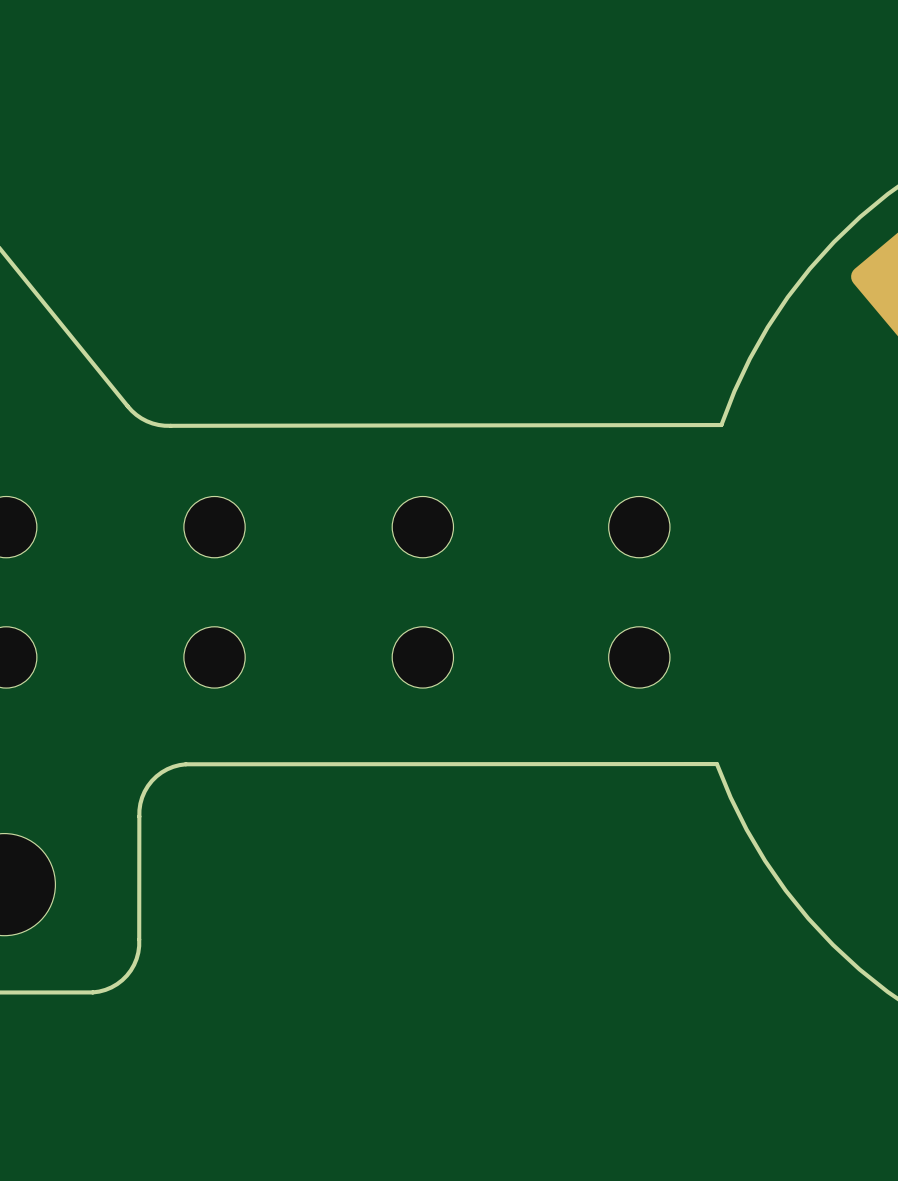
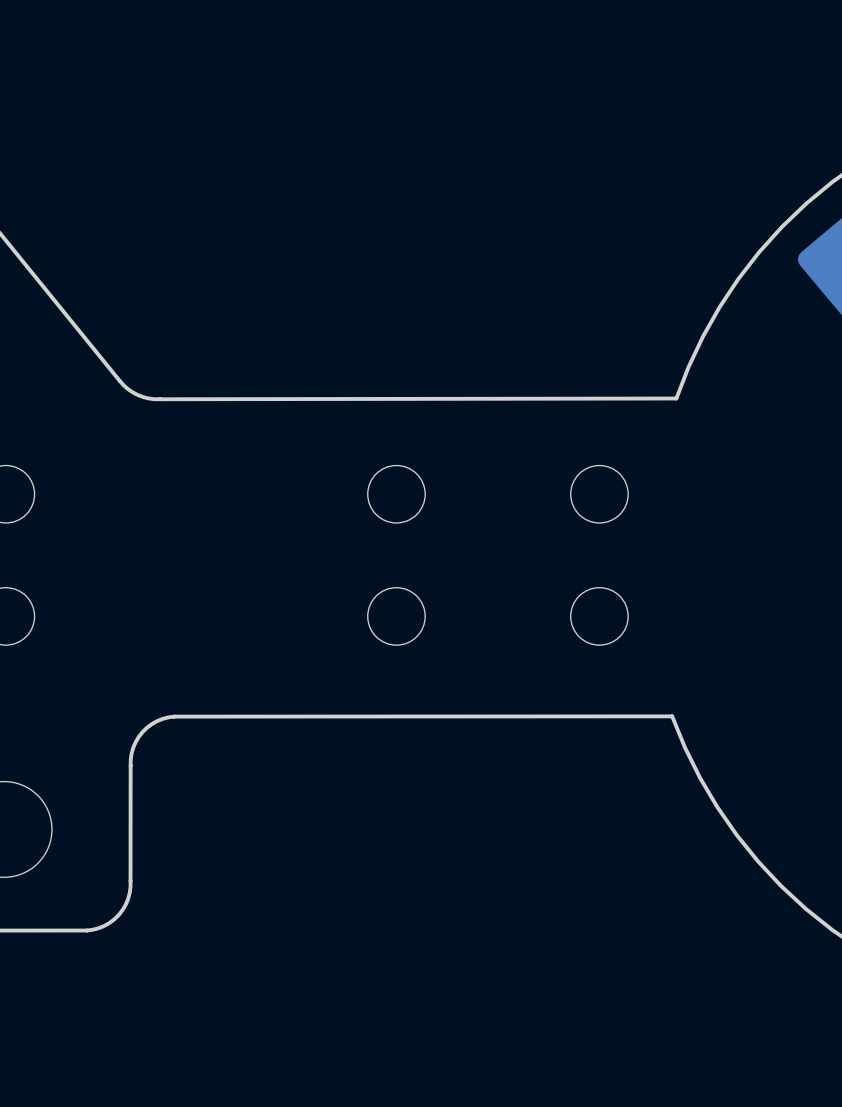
part: (214, 527) -> none
part: (214, 657) -> none

